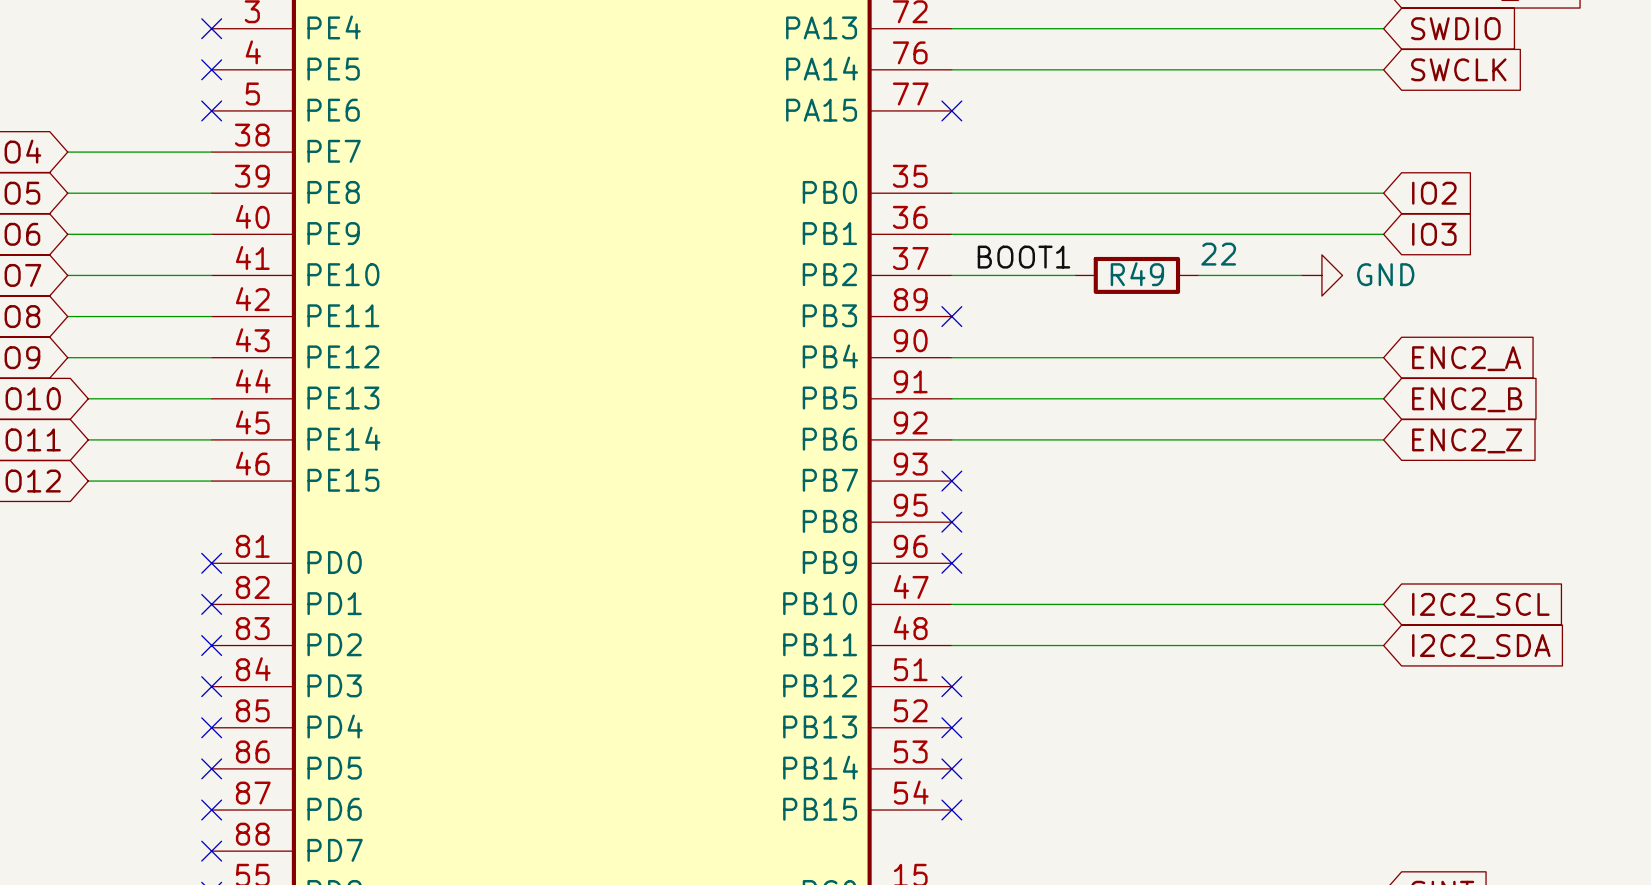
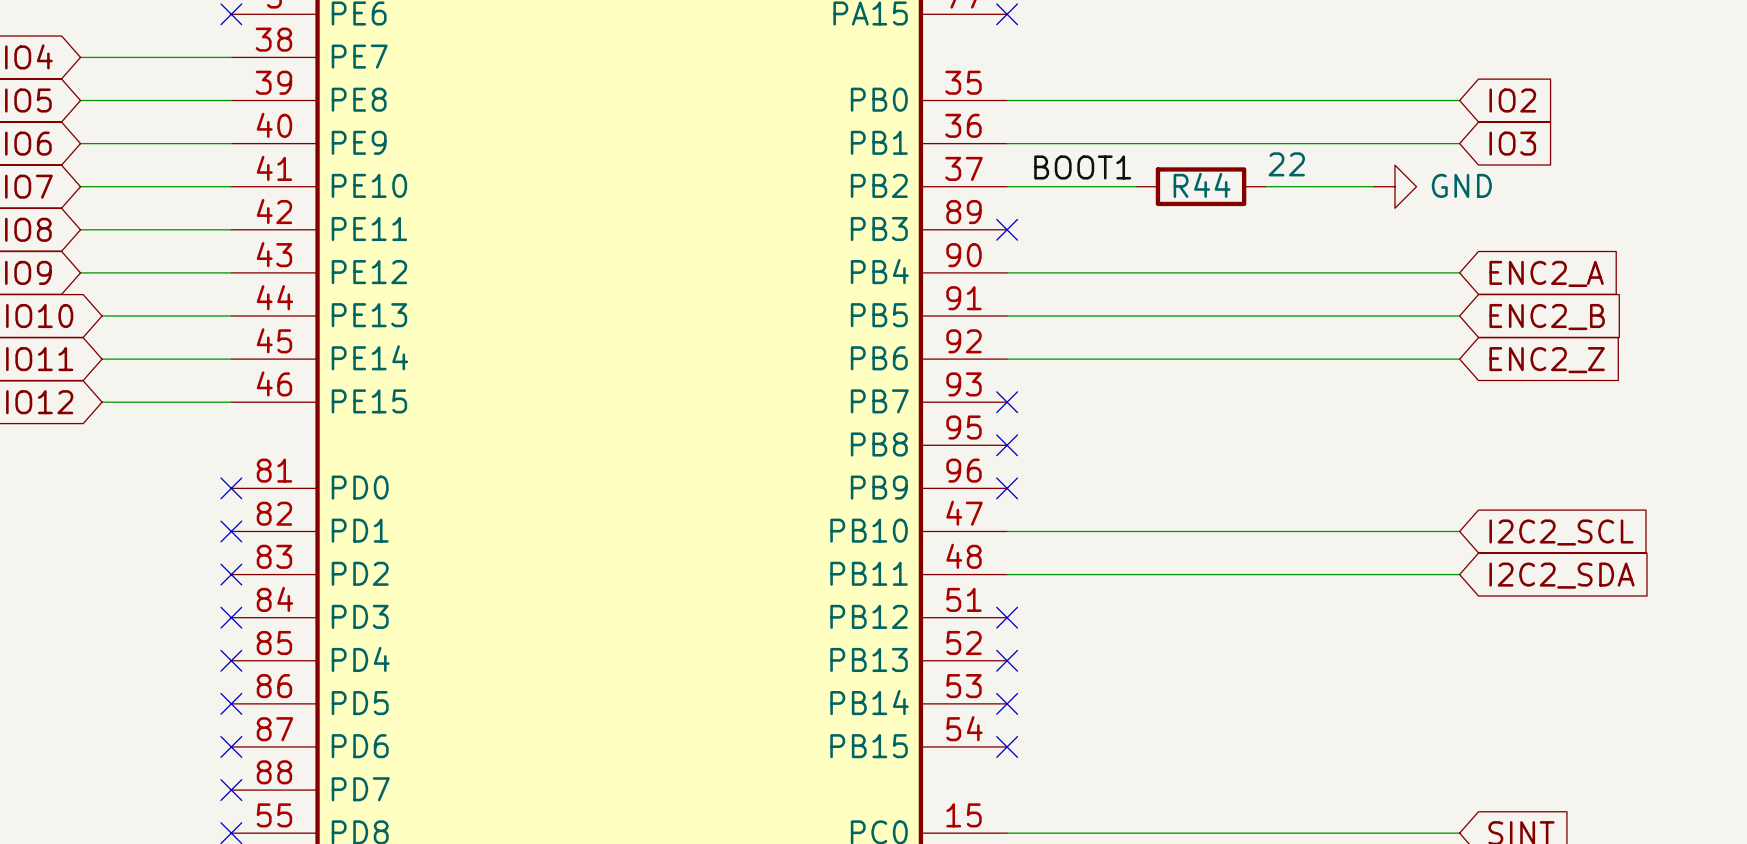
R49 name: R49 (1137, 274) -> R44 (1202, 185)

